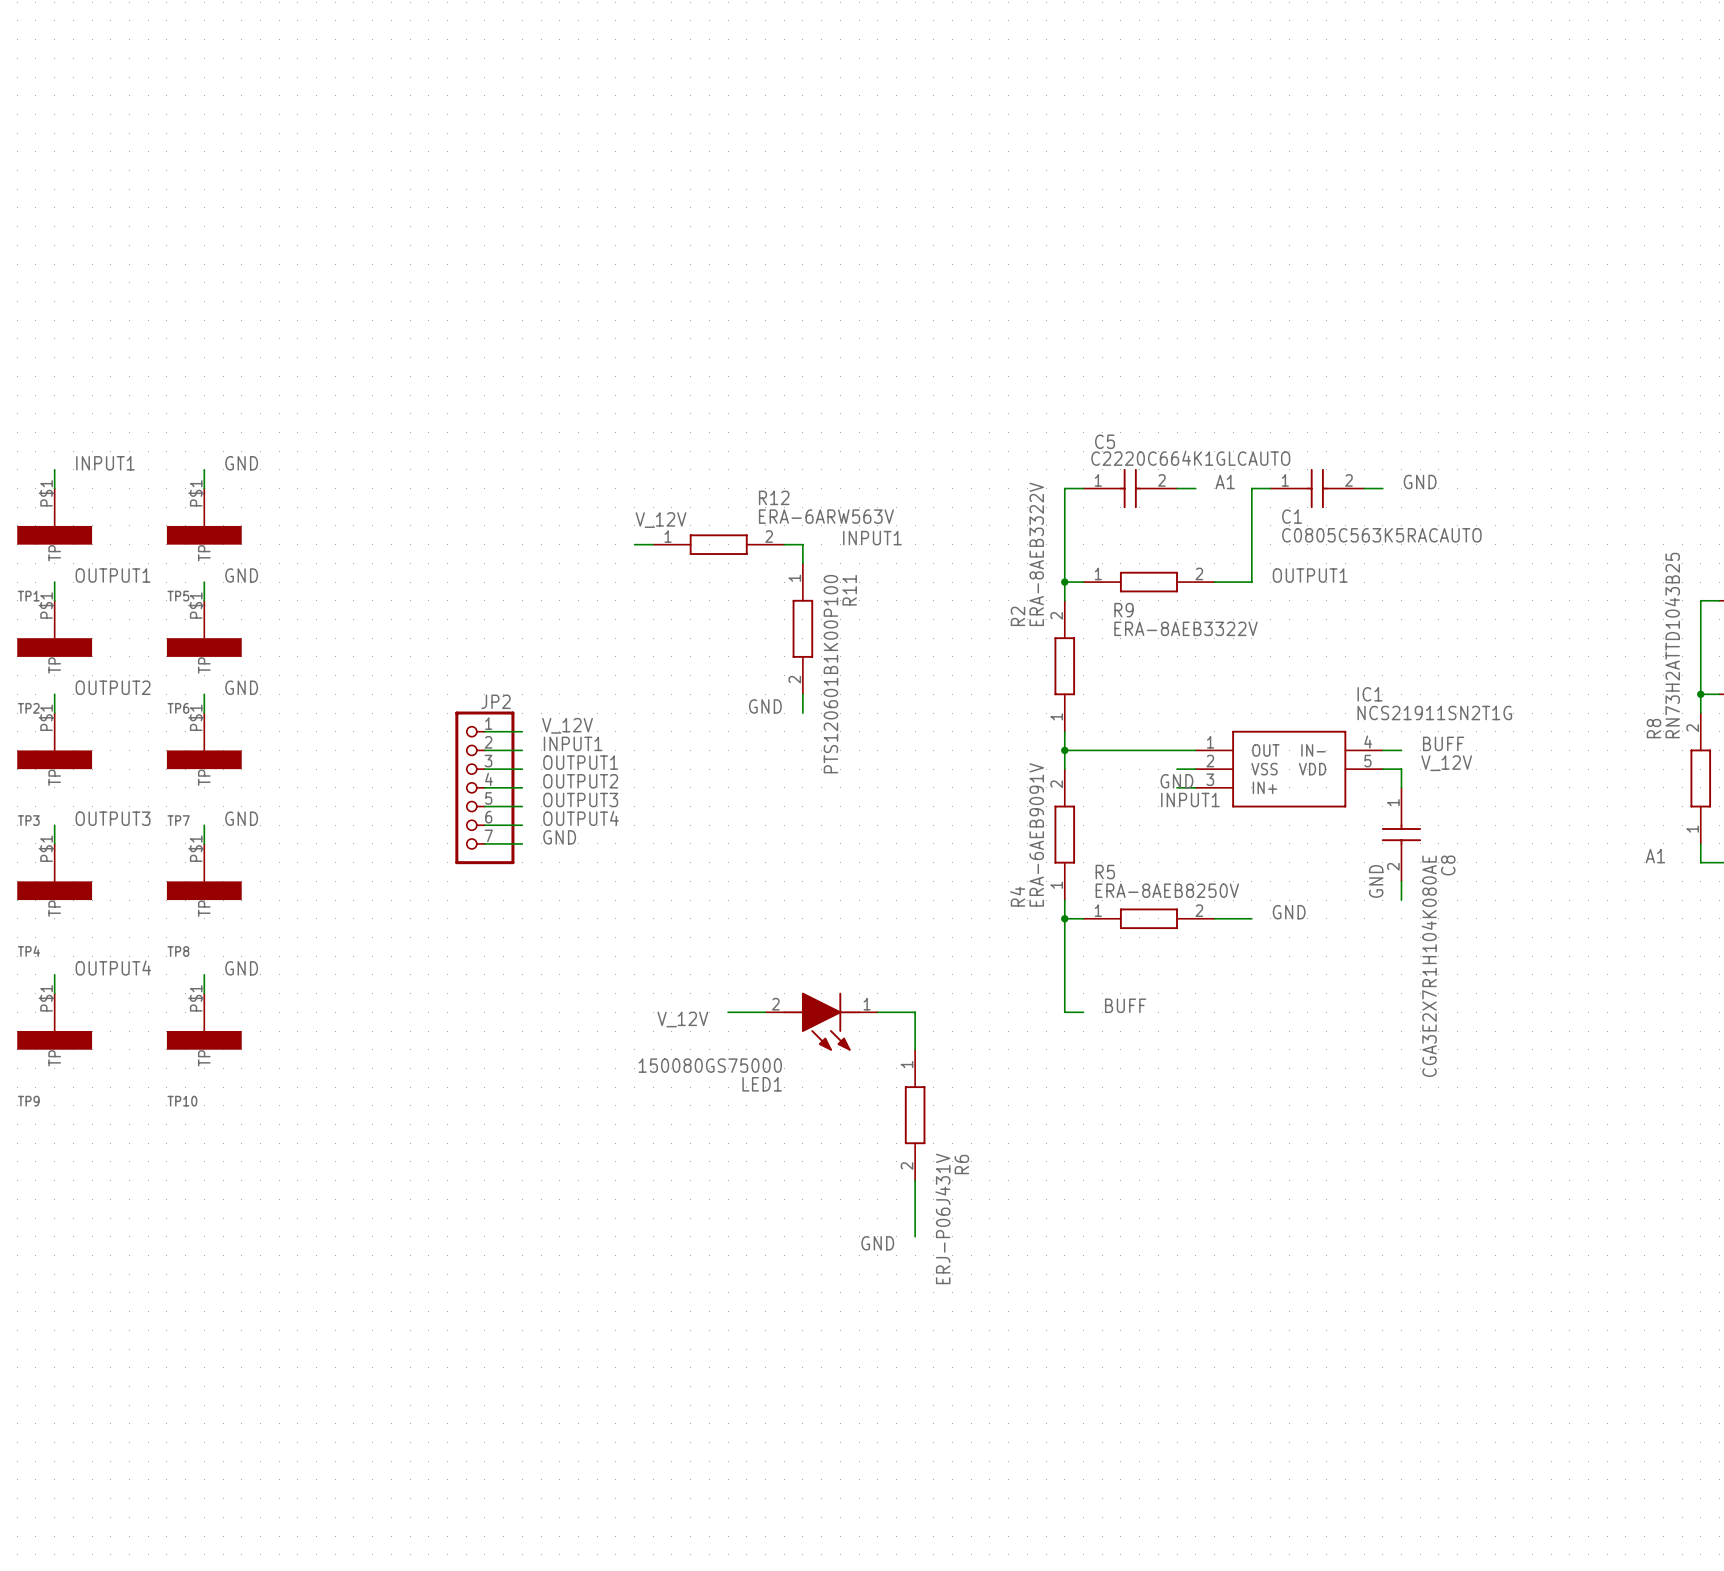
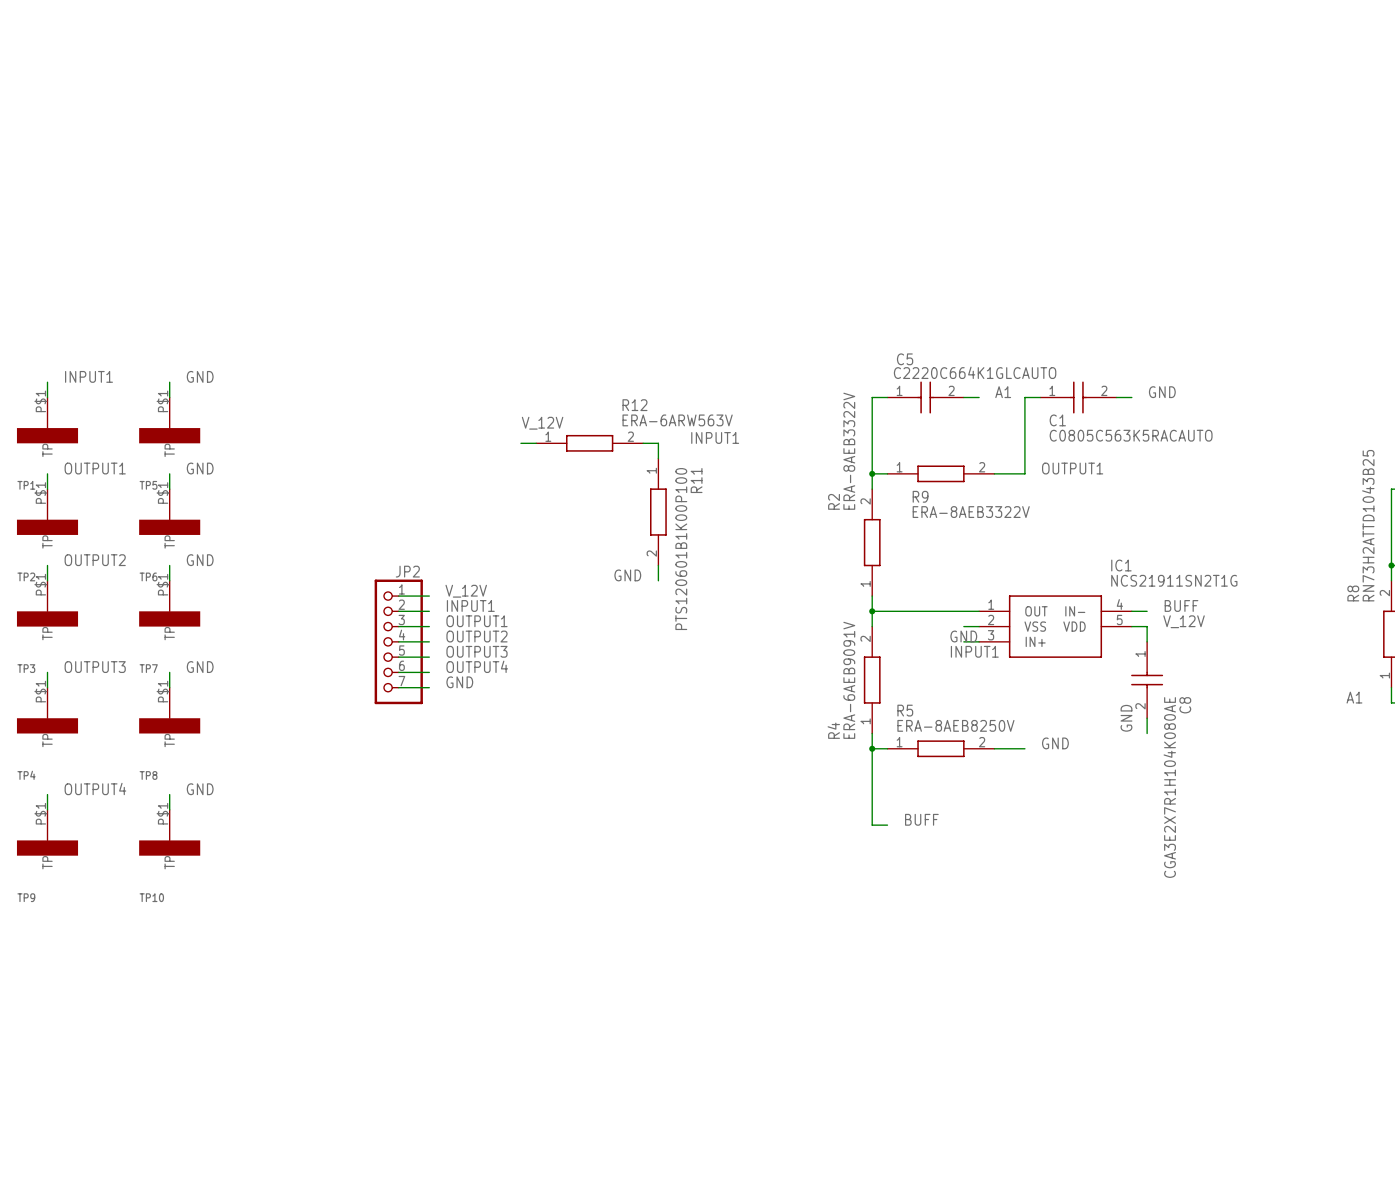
wire: (728, 1012) (765, 1012) -> none
wire: (877, 1012) (915, 1012) (915, 1049) -> none
label: V_12V (682, 1019) -> none
LED1: 150080GS75000 (821, 1021) -> none
R6: ERJ-P06J431V (915, 1115) -> none
wire: (915, 1180) (915, 1236) -> none
label: GND (877, 1243) -> none

